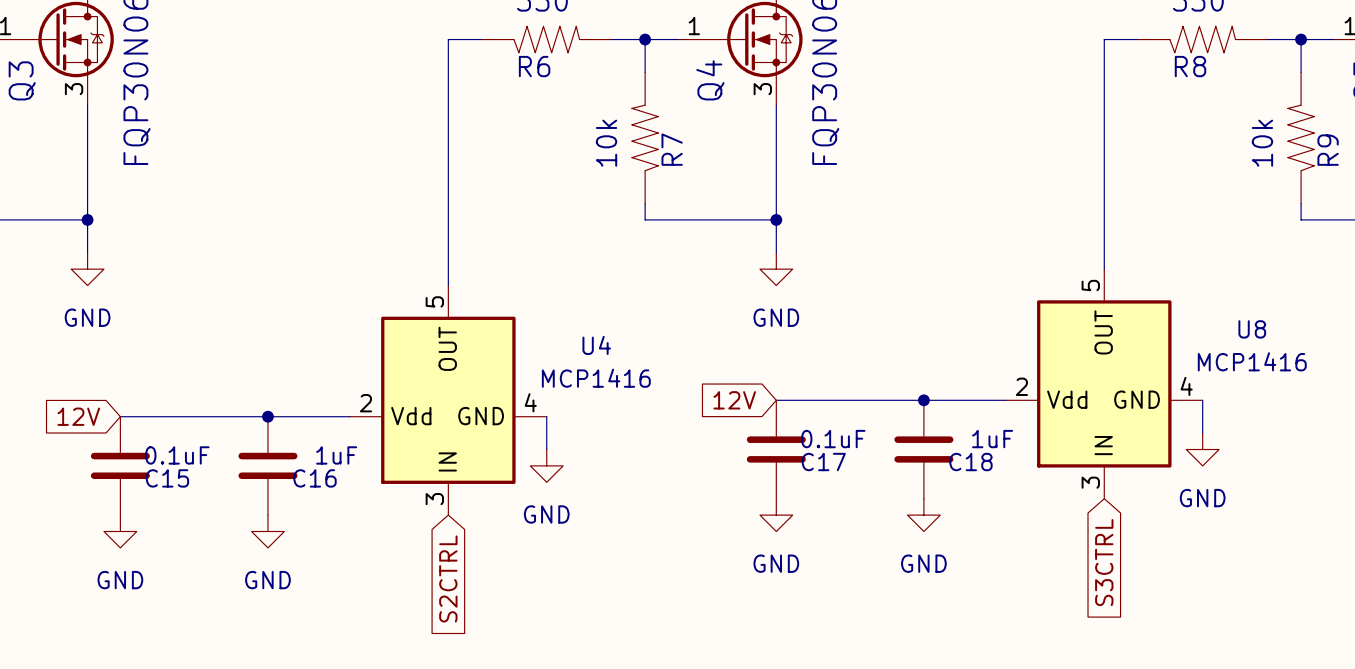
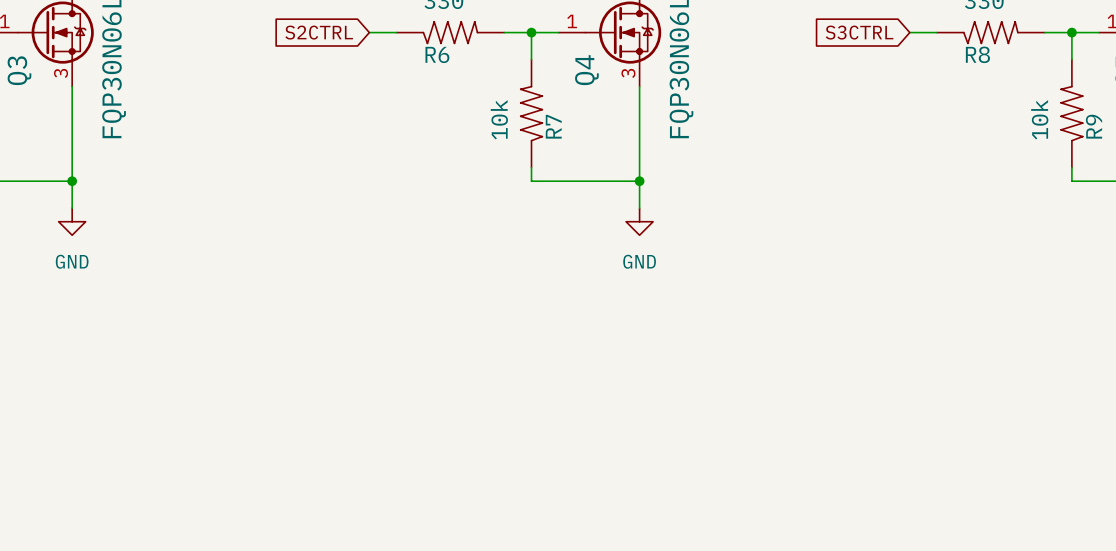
global label: none -> S2CTRL (319, 32)
wire: (448, 39) (448, 285) -> none
global label: none -> S3CTRL (859, 32)
wire: (1104, 39) (1104, 269) -> none
U8: MCP1416 (1104, 383) -> none
U4: MCP1416 (448, 400) -> none
global label: 12V (734, 400) -> none
wire: (776, 400) (1005, 400) -> none
junction: (923, 400) -> none
wire: (1202, 400) (1202, 433) -> none
global label: 12V (78, 416) -> none
wire: (120, 416) (349, 416) -> none
junction: (267, 416) -> none
wire: (546, 416) (546, 449) -> none
C17: 0.1uF (776, 449) -> none
C18: 1uF (923, 449) -> none
power symbol: GND (1202, 449) -> none
C15: 0.1uF (120, 465) -> none
C16: 1uF (267, 465) -> none
power symbol: GND (546, 465) -> none
power symbol: GND (776, 515) -> none
power symbol: GND (923, 515) -> none
power symbol: GND (120, 531) -> none
power symbol: GND (267, 531) -> none
global label: S3CTRL (1104, 562) -> none
global label: S2CTRL (448, 578) -> none

